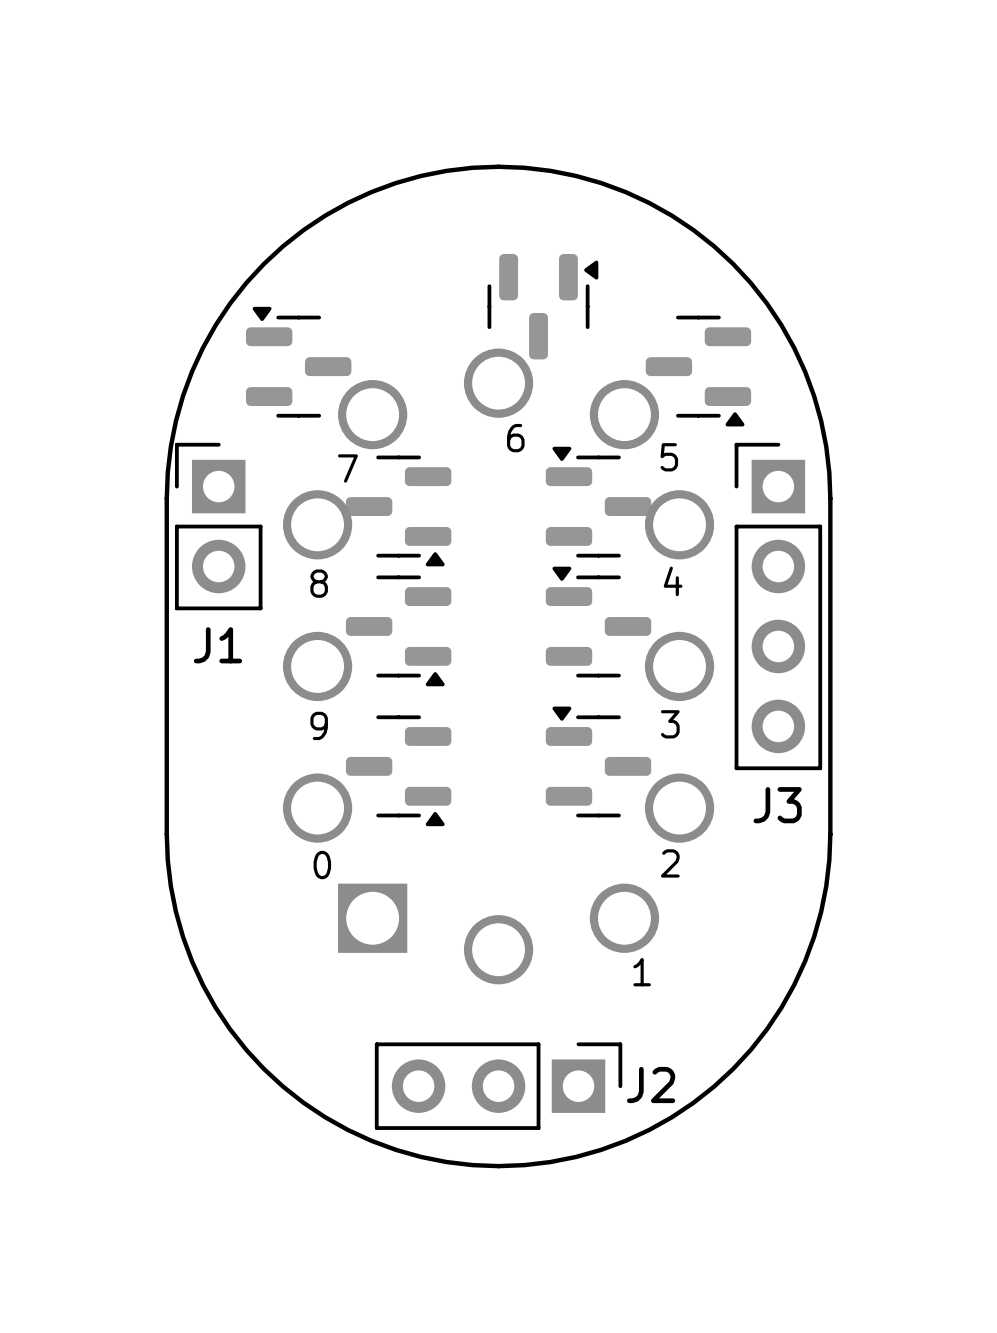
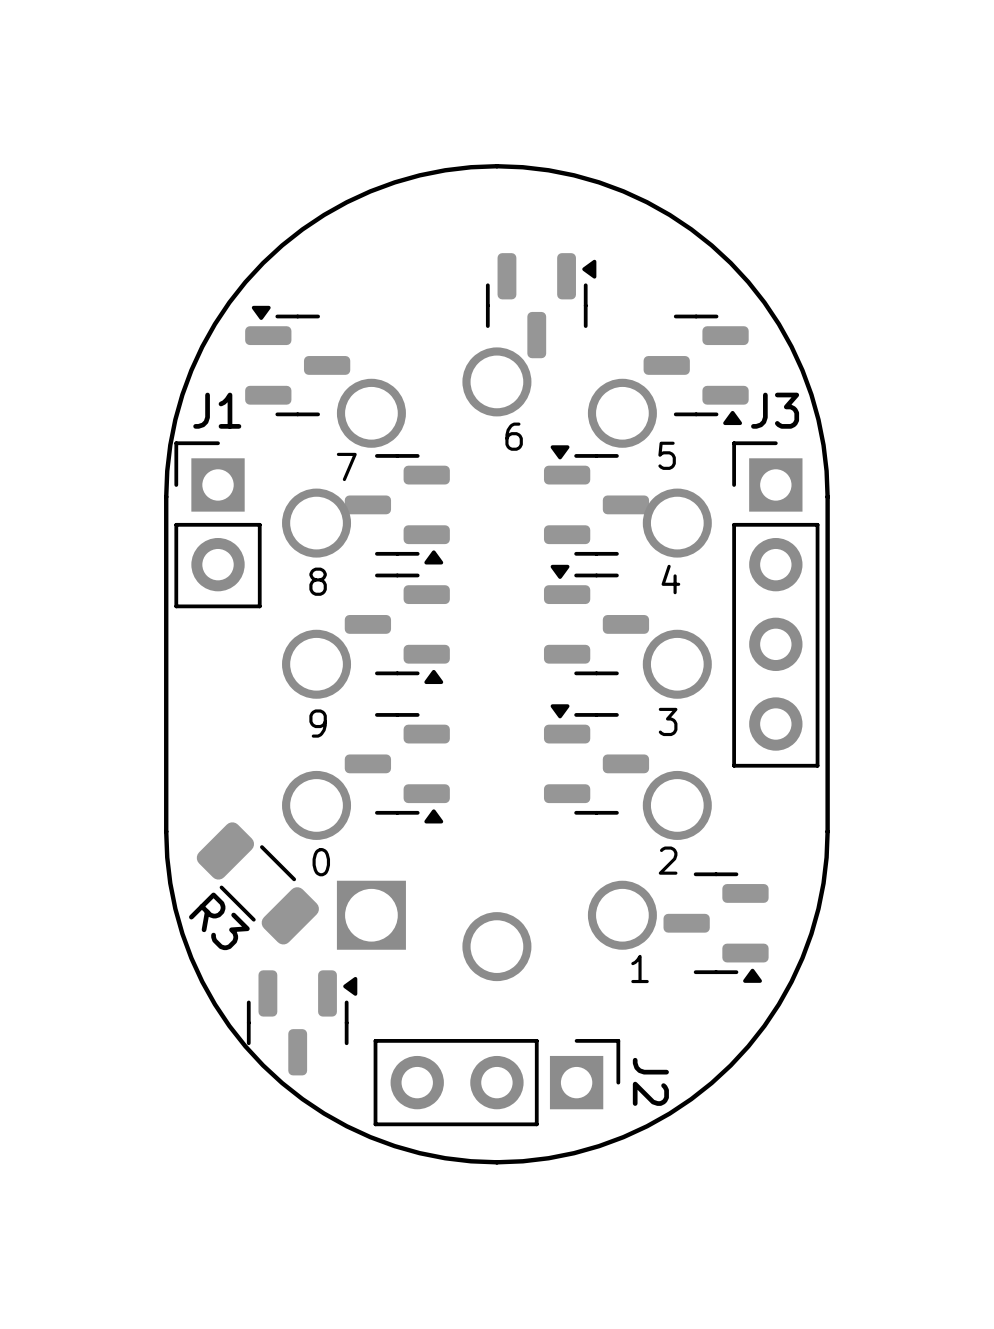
J1 name position: J1 (217, 645) -> J1 (217, 410)
J3 name position: J3 (777, 805) -> J3 (775, 410)
R3: none -> (257, 883)
part: none -> (716, 927)
part: none -> (302, 1022)
J2 name rotation: 0° (651, 1085) -> 90° clockwise (650, 1081)

